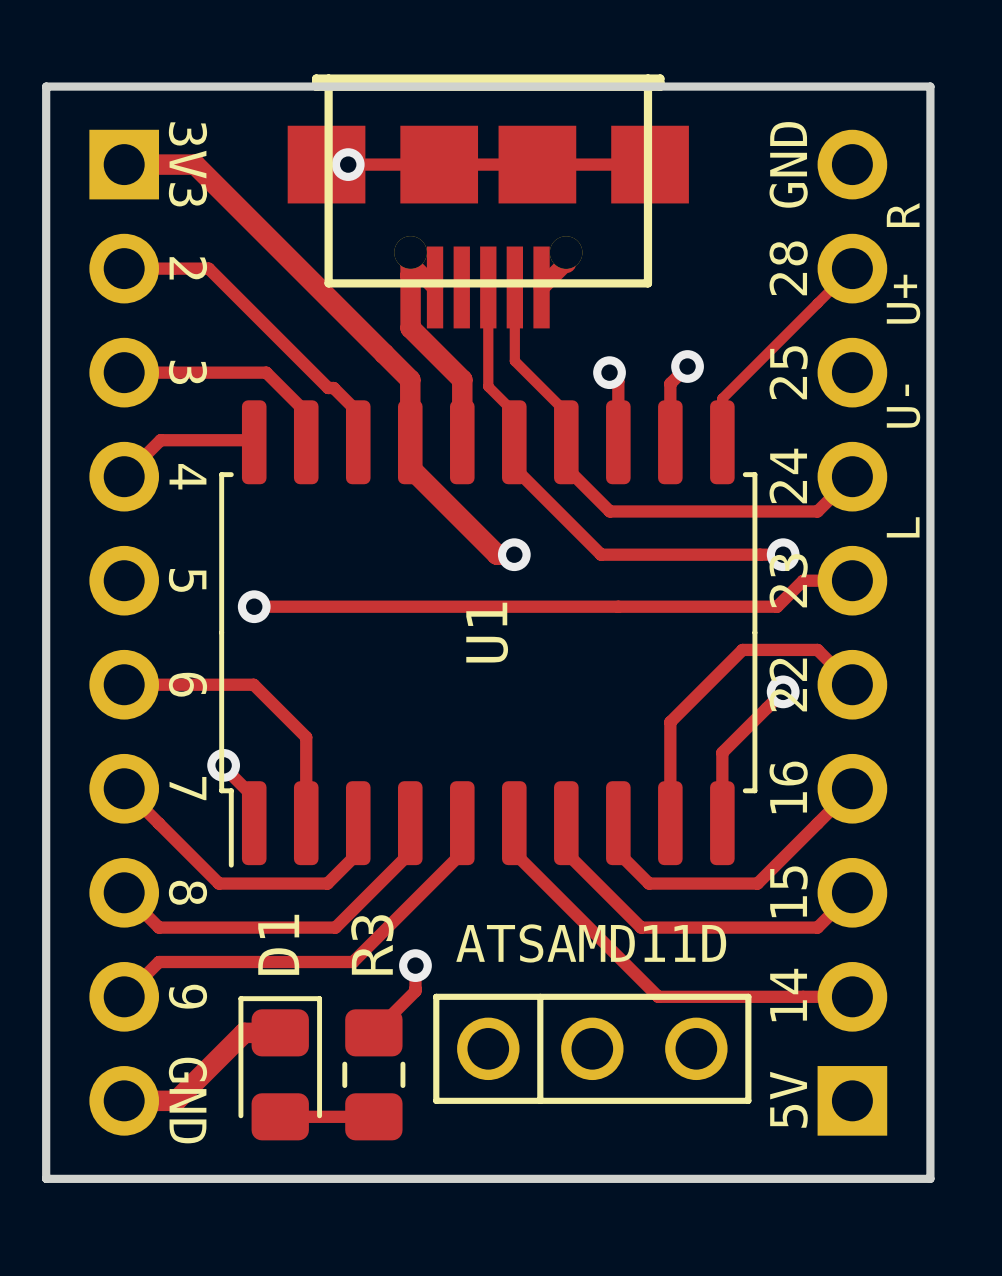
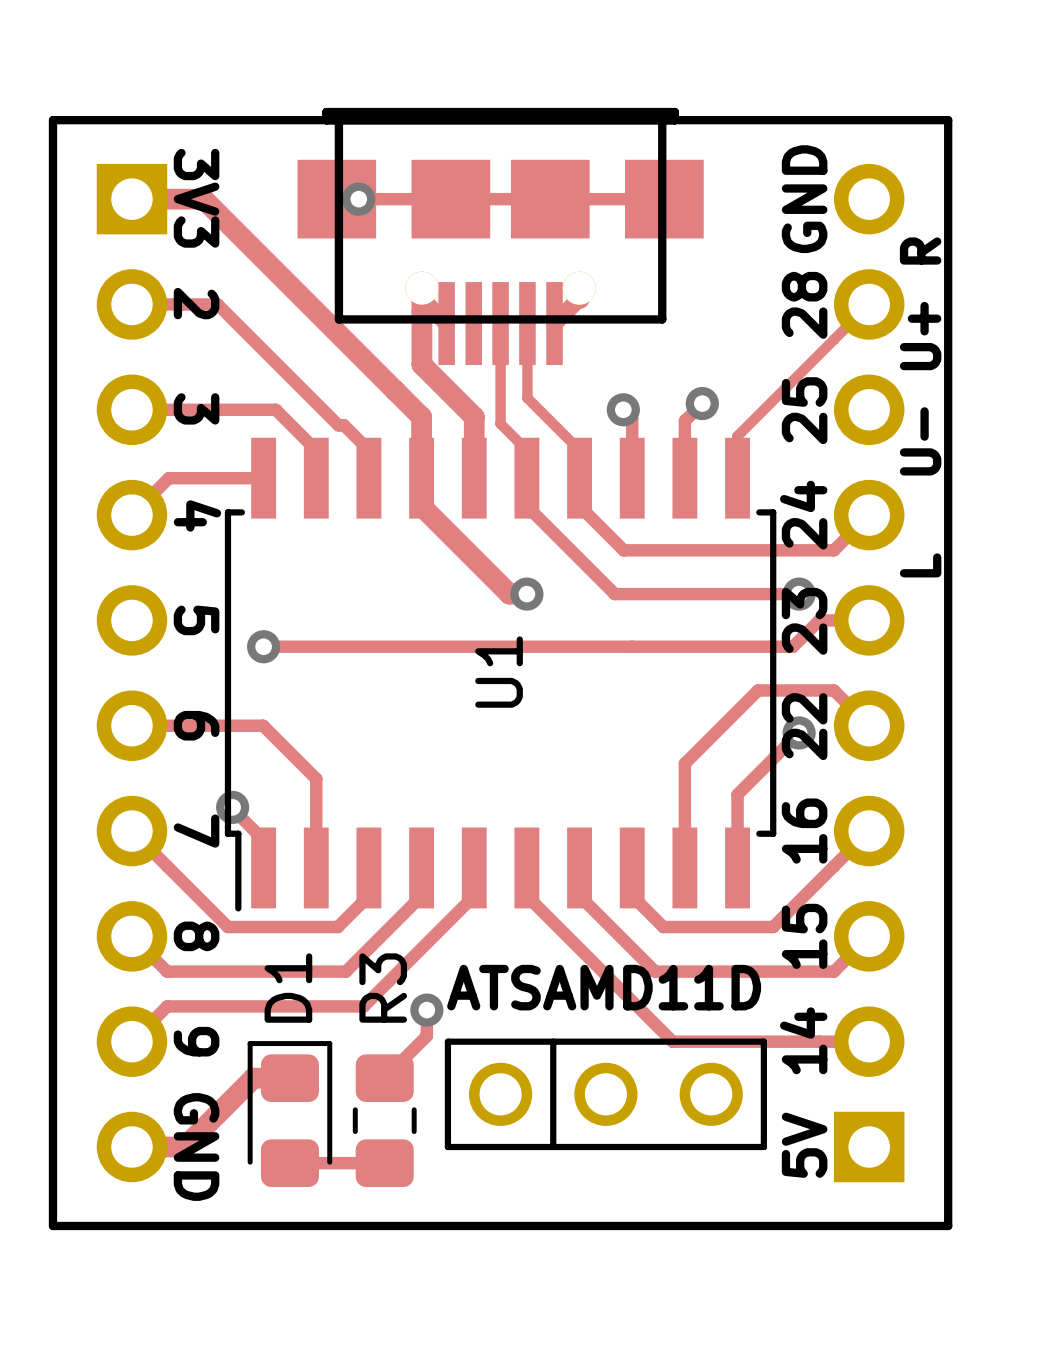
U1 footprint: [219, 400, 758, 868] -> [224, 437, 777, 912]

